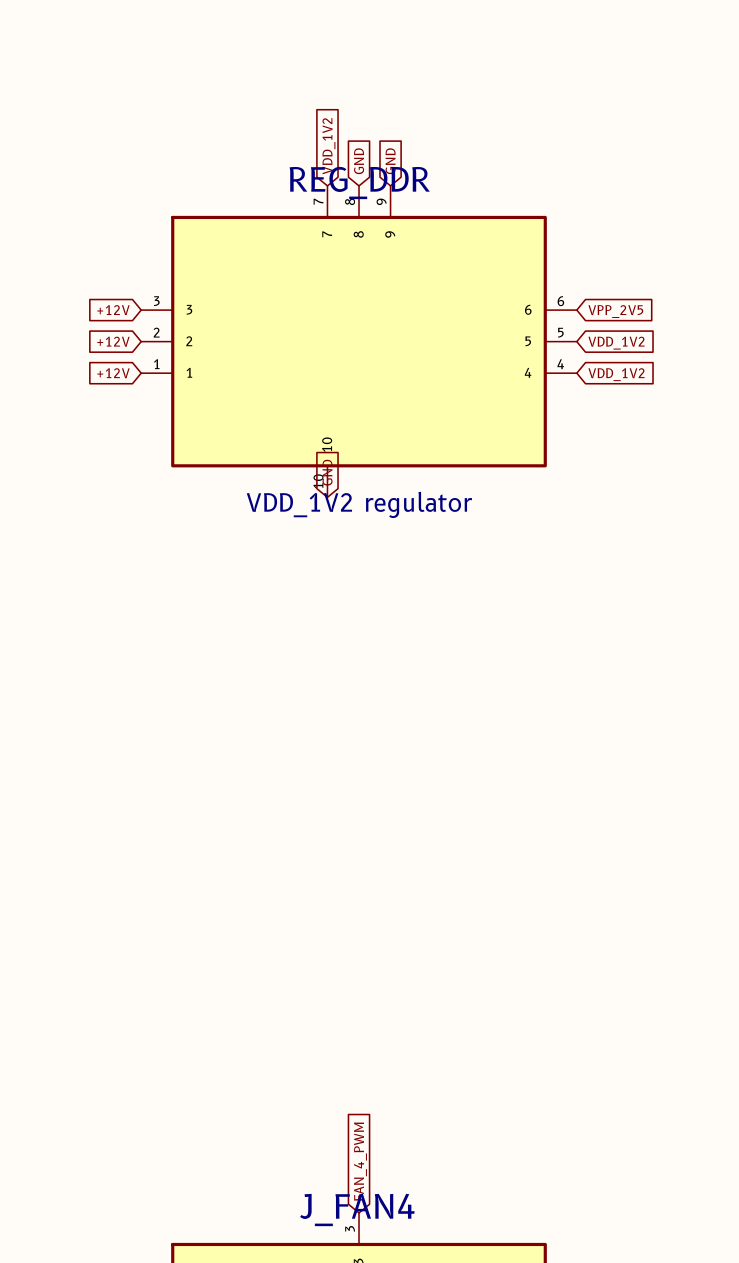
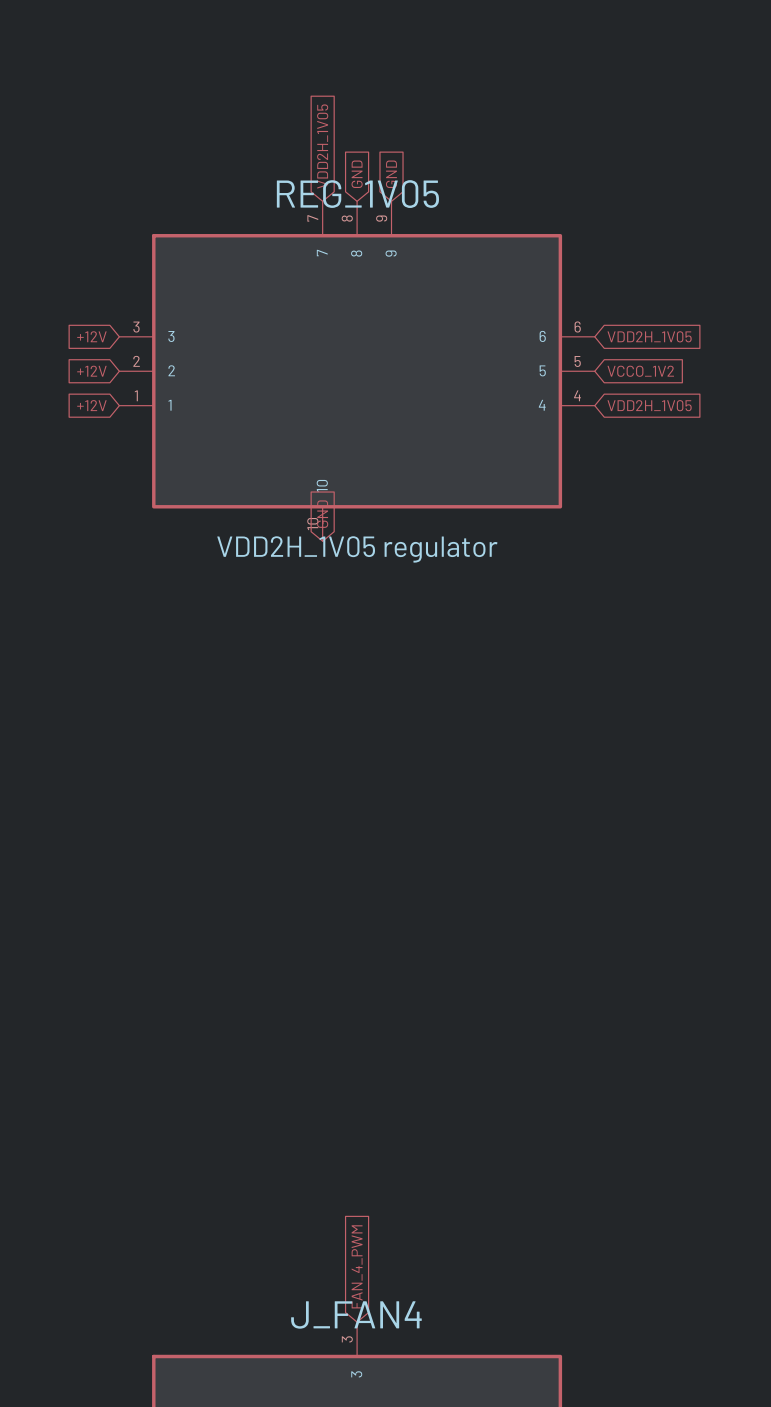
global label: VDD_1V2 (328, 146) -> VDD2H_1V05 (322, 146)
REG_DDR name: REG_DDR (359, 183) -> REG_1V05 (357, 194)
global label: VPP_2V5 (615, 311) -> VDD2H_1V05 (649, 336)
global label: VDD_1V2 (616, 343) -> VCCO_1V2 (640, 371)
global label: VDD_1V2 (616, 374) -> VDD2H_1V05 (649, 405)
REG_DDR value: VDD_1V2 regulator (359, 504) -> VDD2H_1V05 regulator (357, 549)

